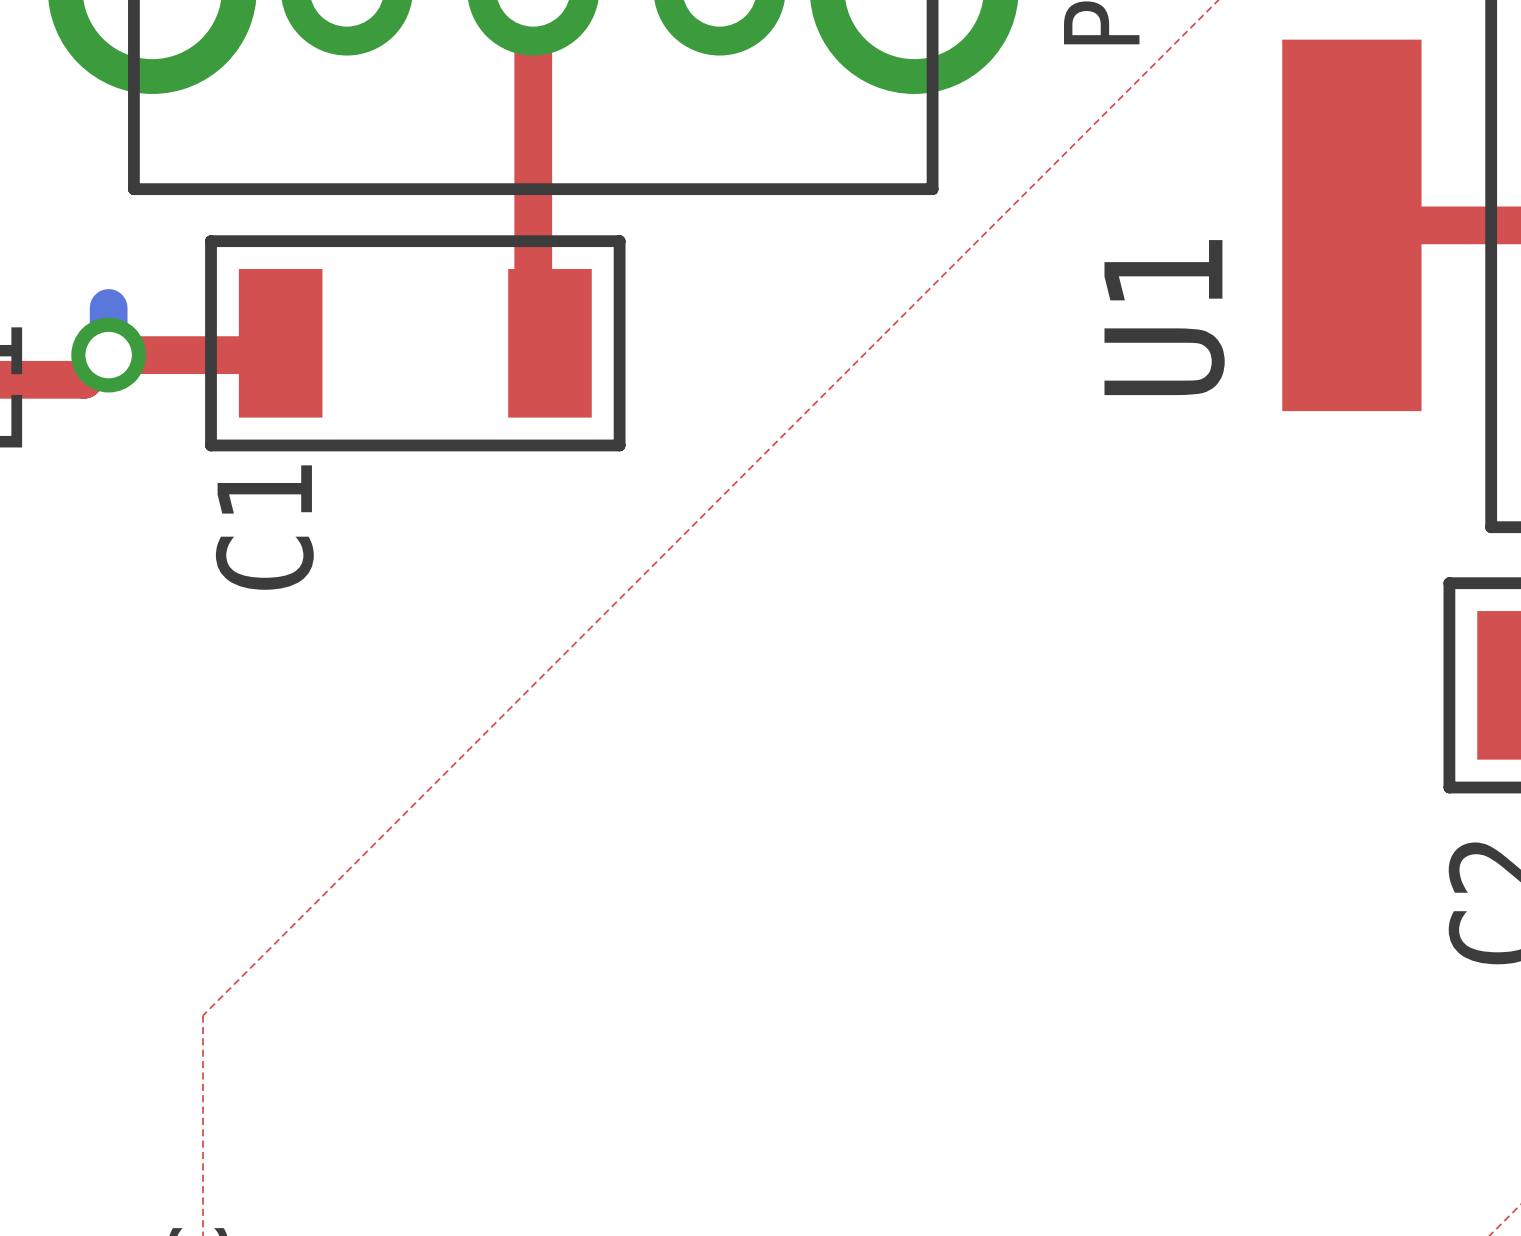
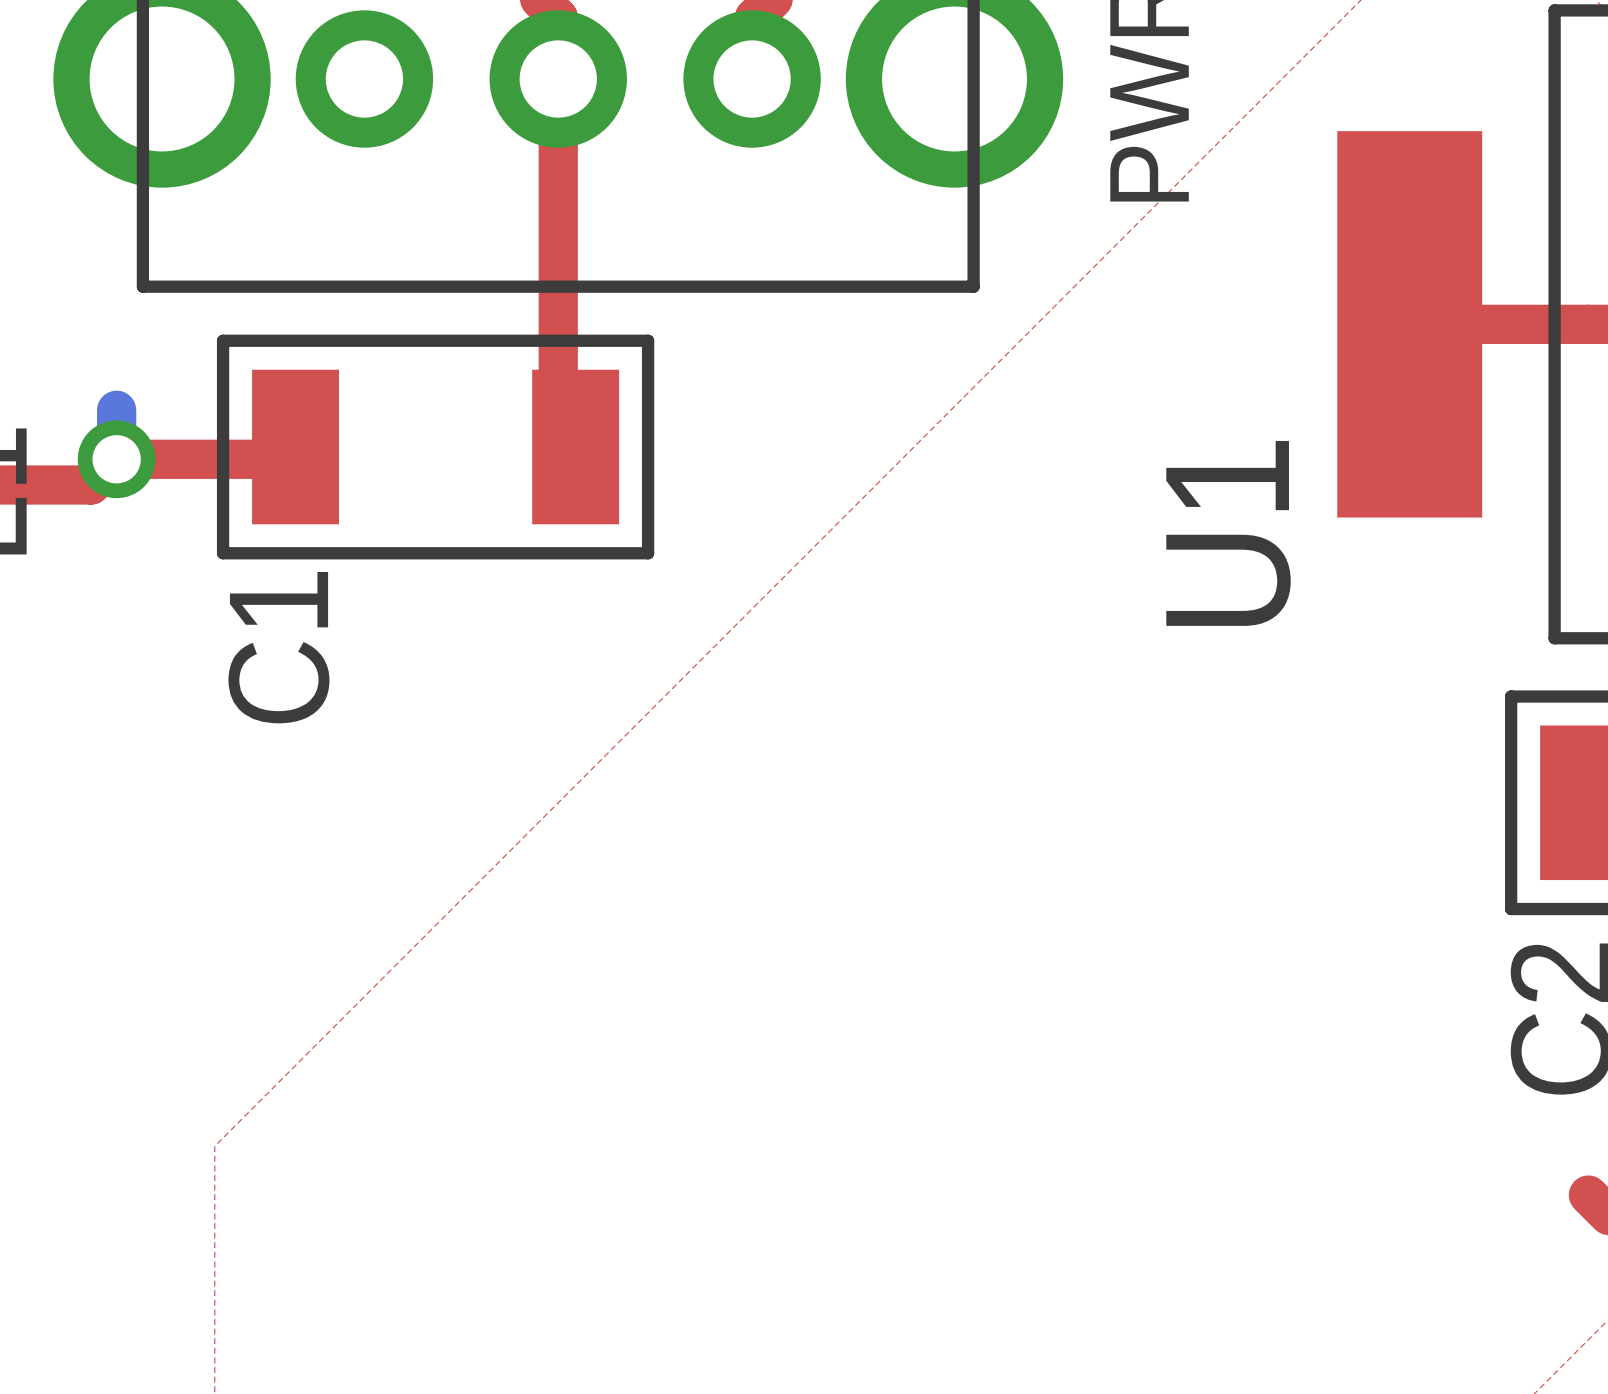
U1 name position: U1 (1164, 317) -> U1 (1228, 533)

